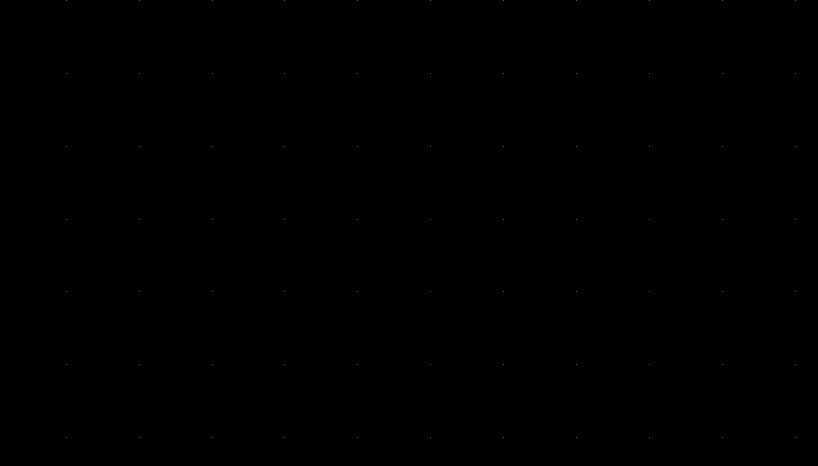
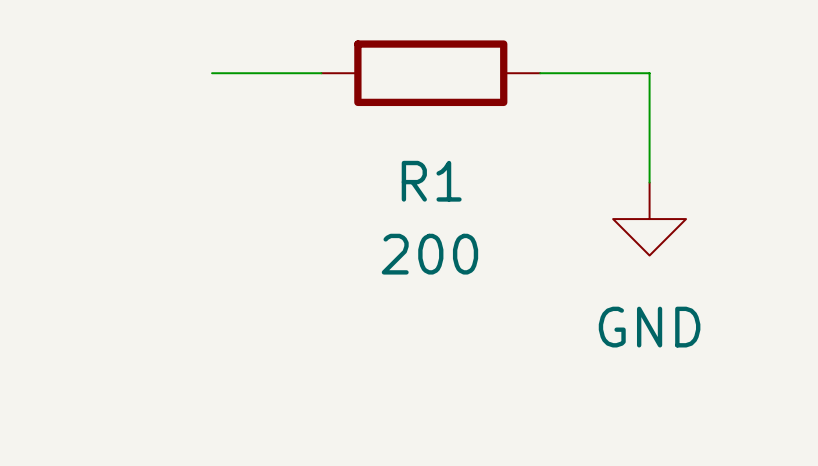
wire: none -> (212, 73) (321, 73)
R1: none -> 200 (430, 73)
wire: none -> (540, 73) (649, 73) (649, 182)
power symbol: none -> GND (649, 219)

